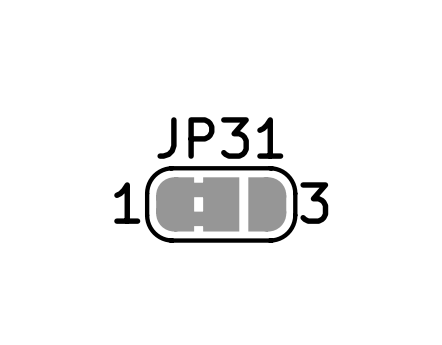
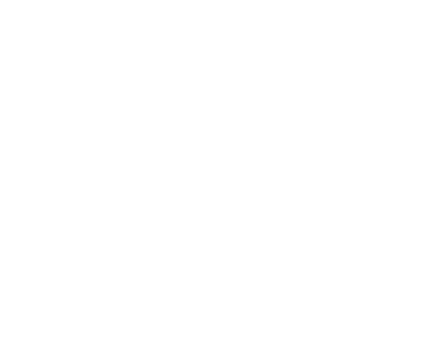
JP31: (221, 204) -> none

